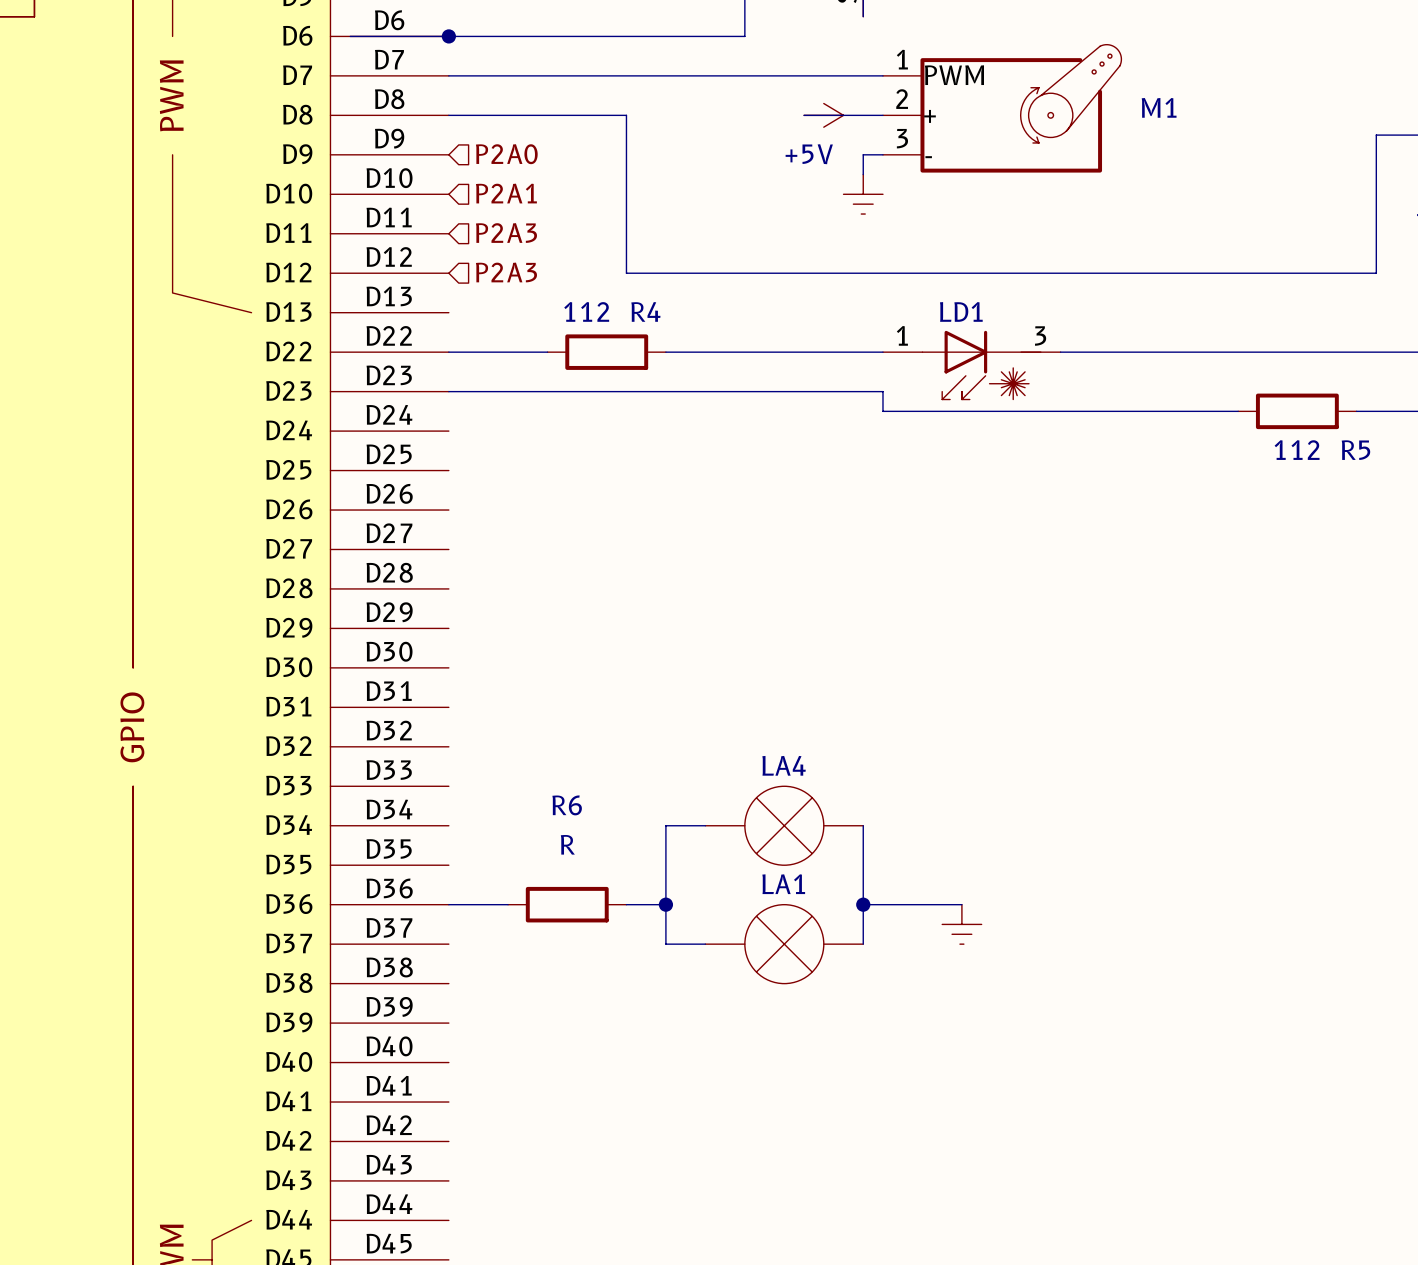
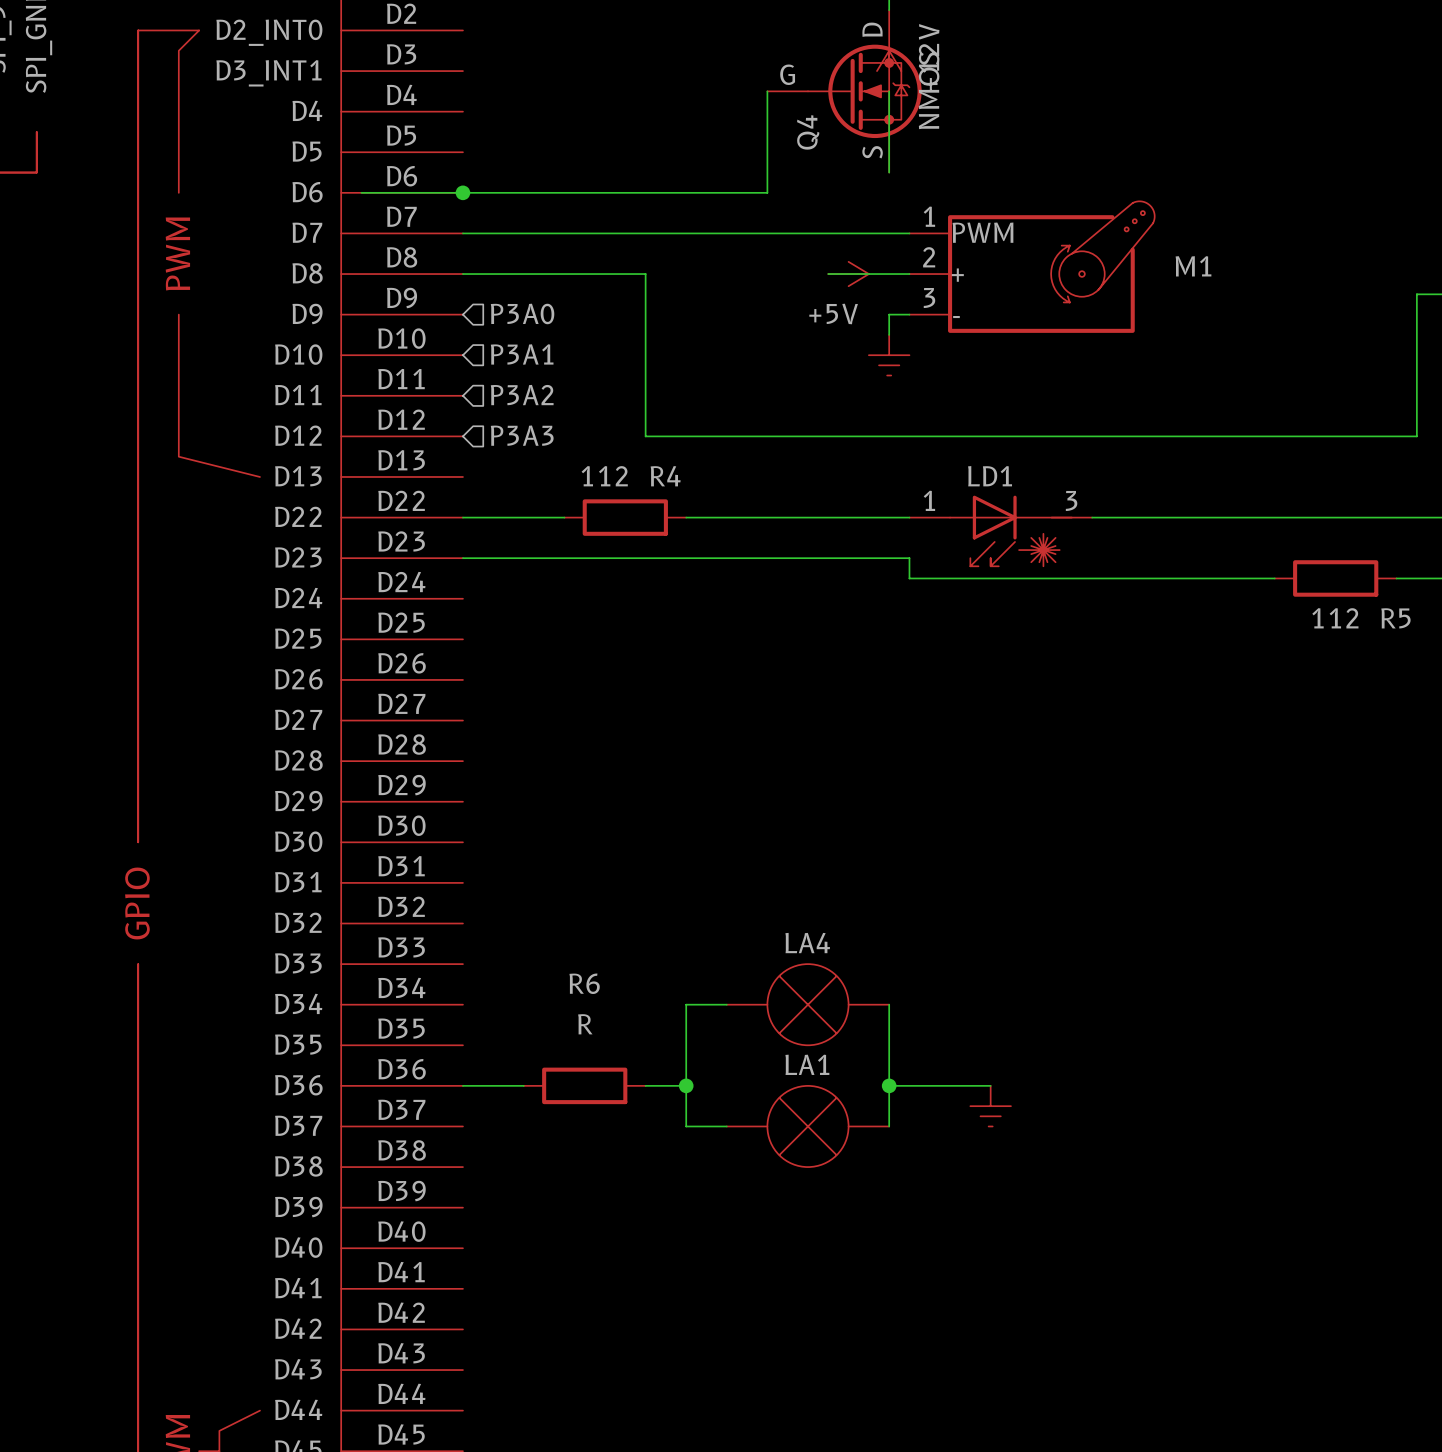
hierarchical label: P2A0 (506, 154) -> P3A0 (522, 313)
hierarchical label: P2A1 (506, 193) -> P3A1 (522, 354)
hierarchical label: P2A3 (506, 233) -> P3A2 (522, 395)
hierarchical label: P2A3 (506, 272) -> P3A3 (522, 435)

